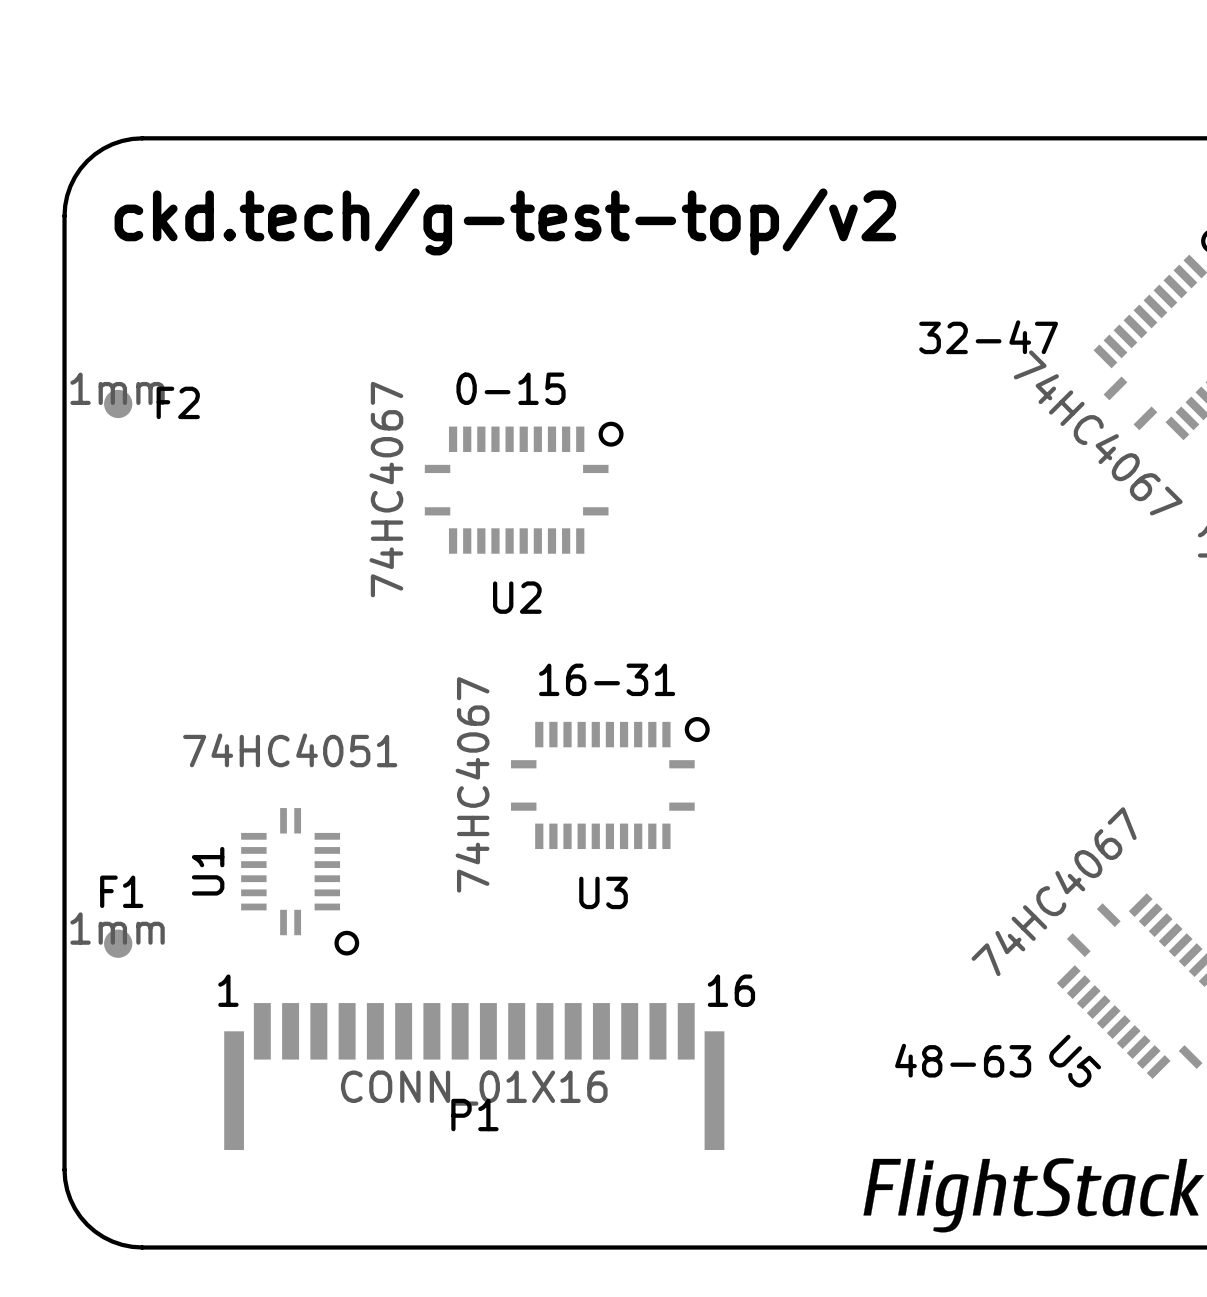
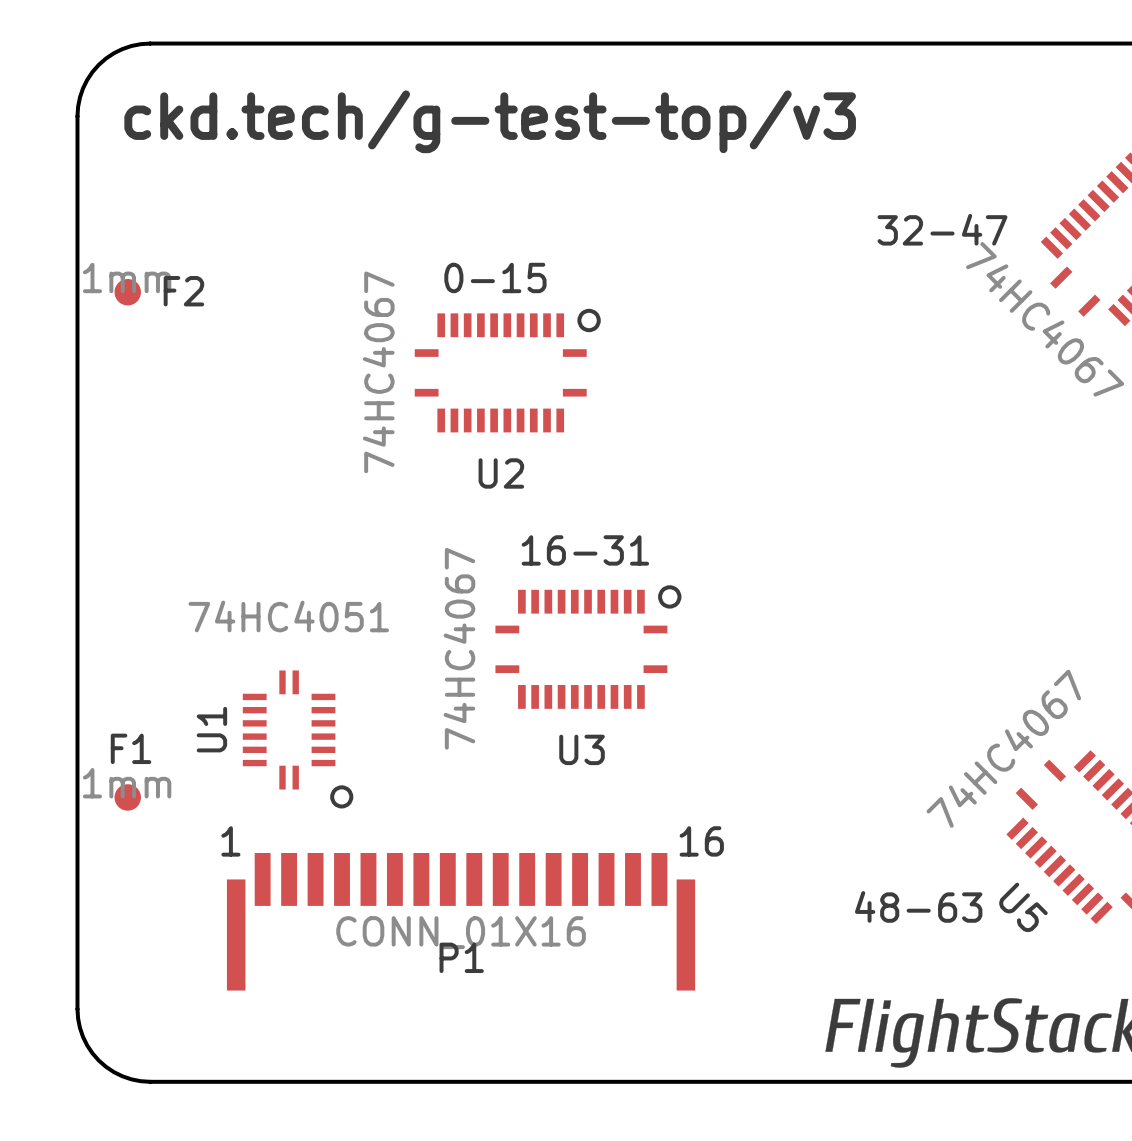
text: ckd.tech/g-test-top/v2 (505, 221) -> ckd.tech/g-test-top/v3 (490, 121)

